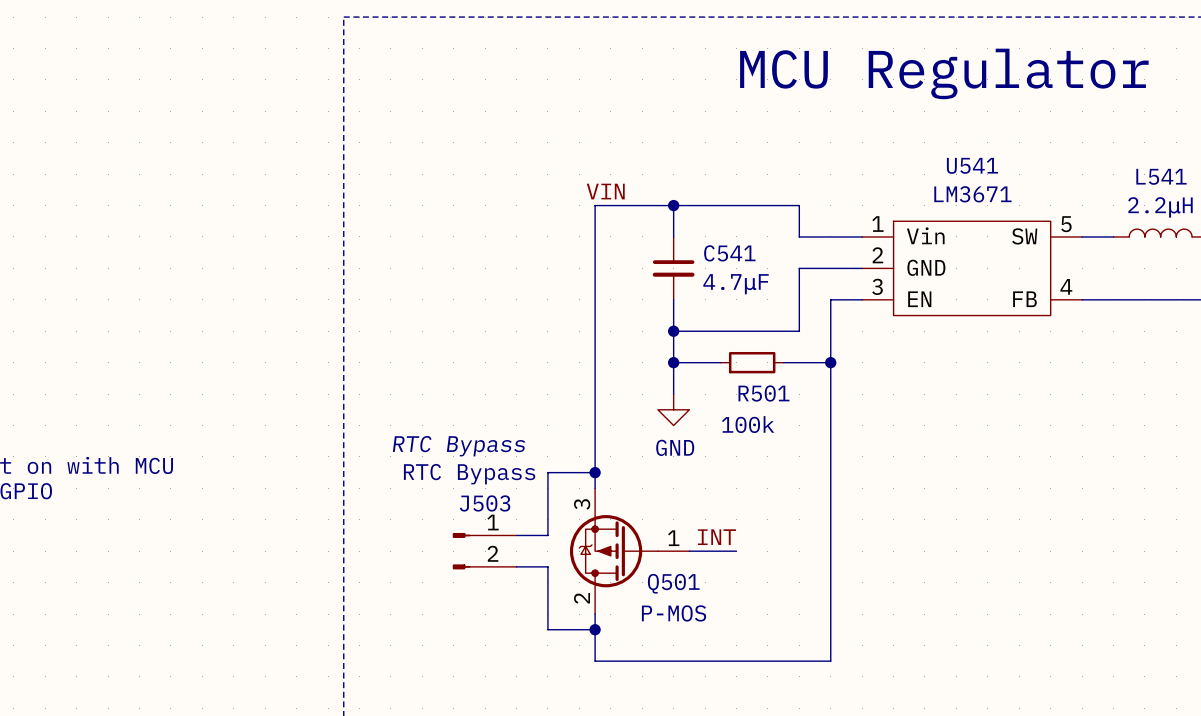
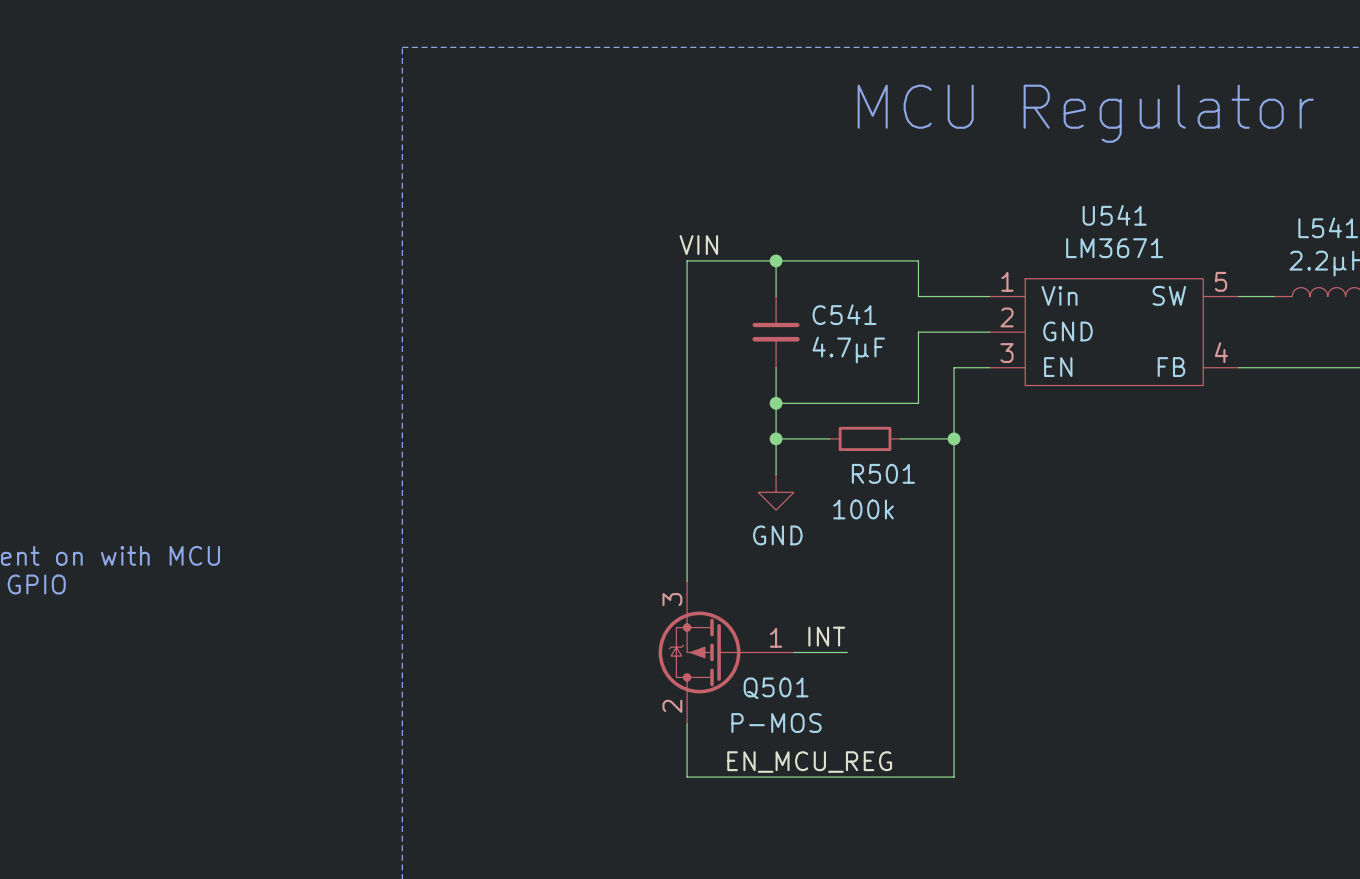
text: RTC Bypass (459, 446) -> none
wire: (595, 472) (547, 472) (547, 535) (516, 535) -> none
junction: (595, 472) -> none
J503: RTC Bypass (484, 551) -> none
wire: (516, 566) (547, 566) (547, 629) (595, 629) -> none
junction: (595, 629) -> none
label: none -> EN_MCU_REG (809, 762)

